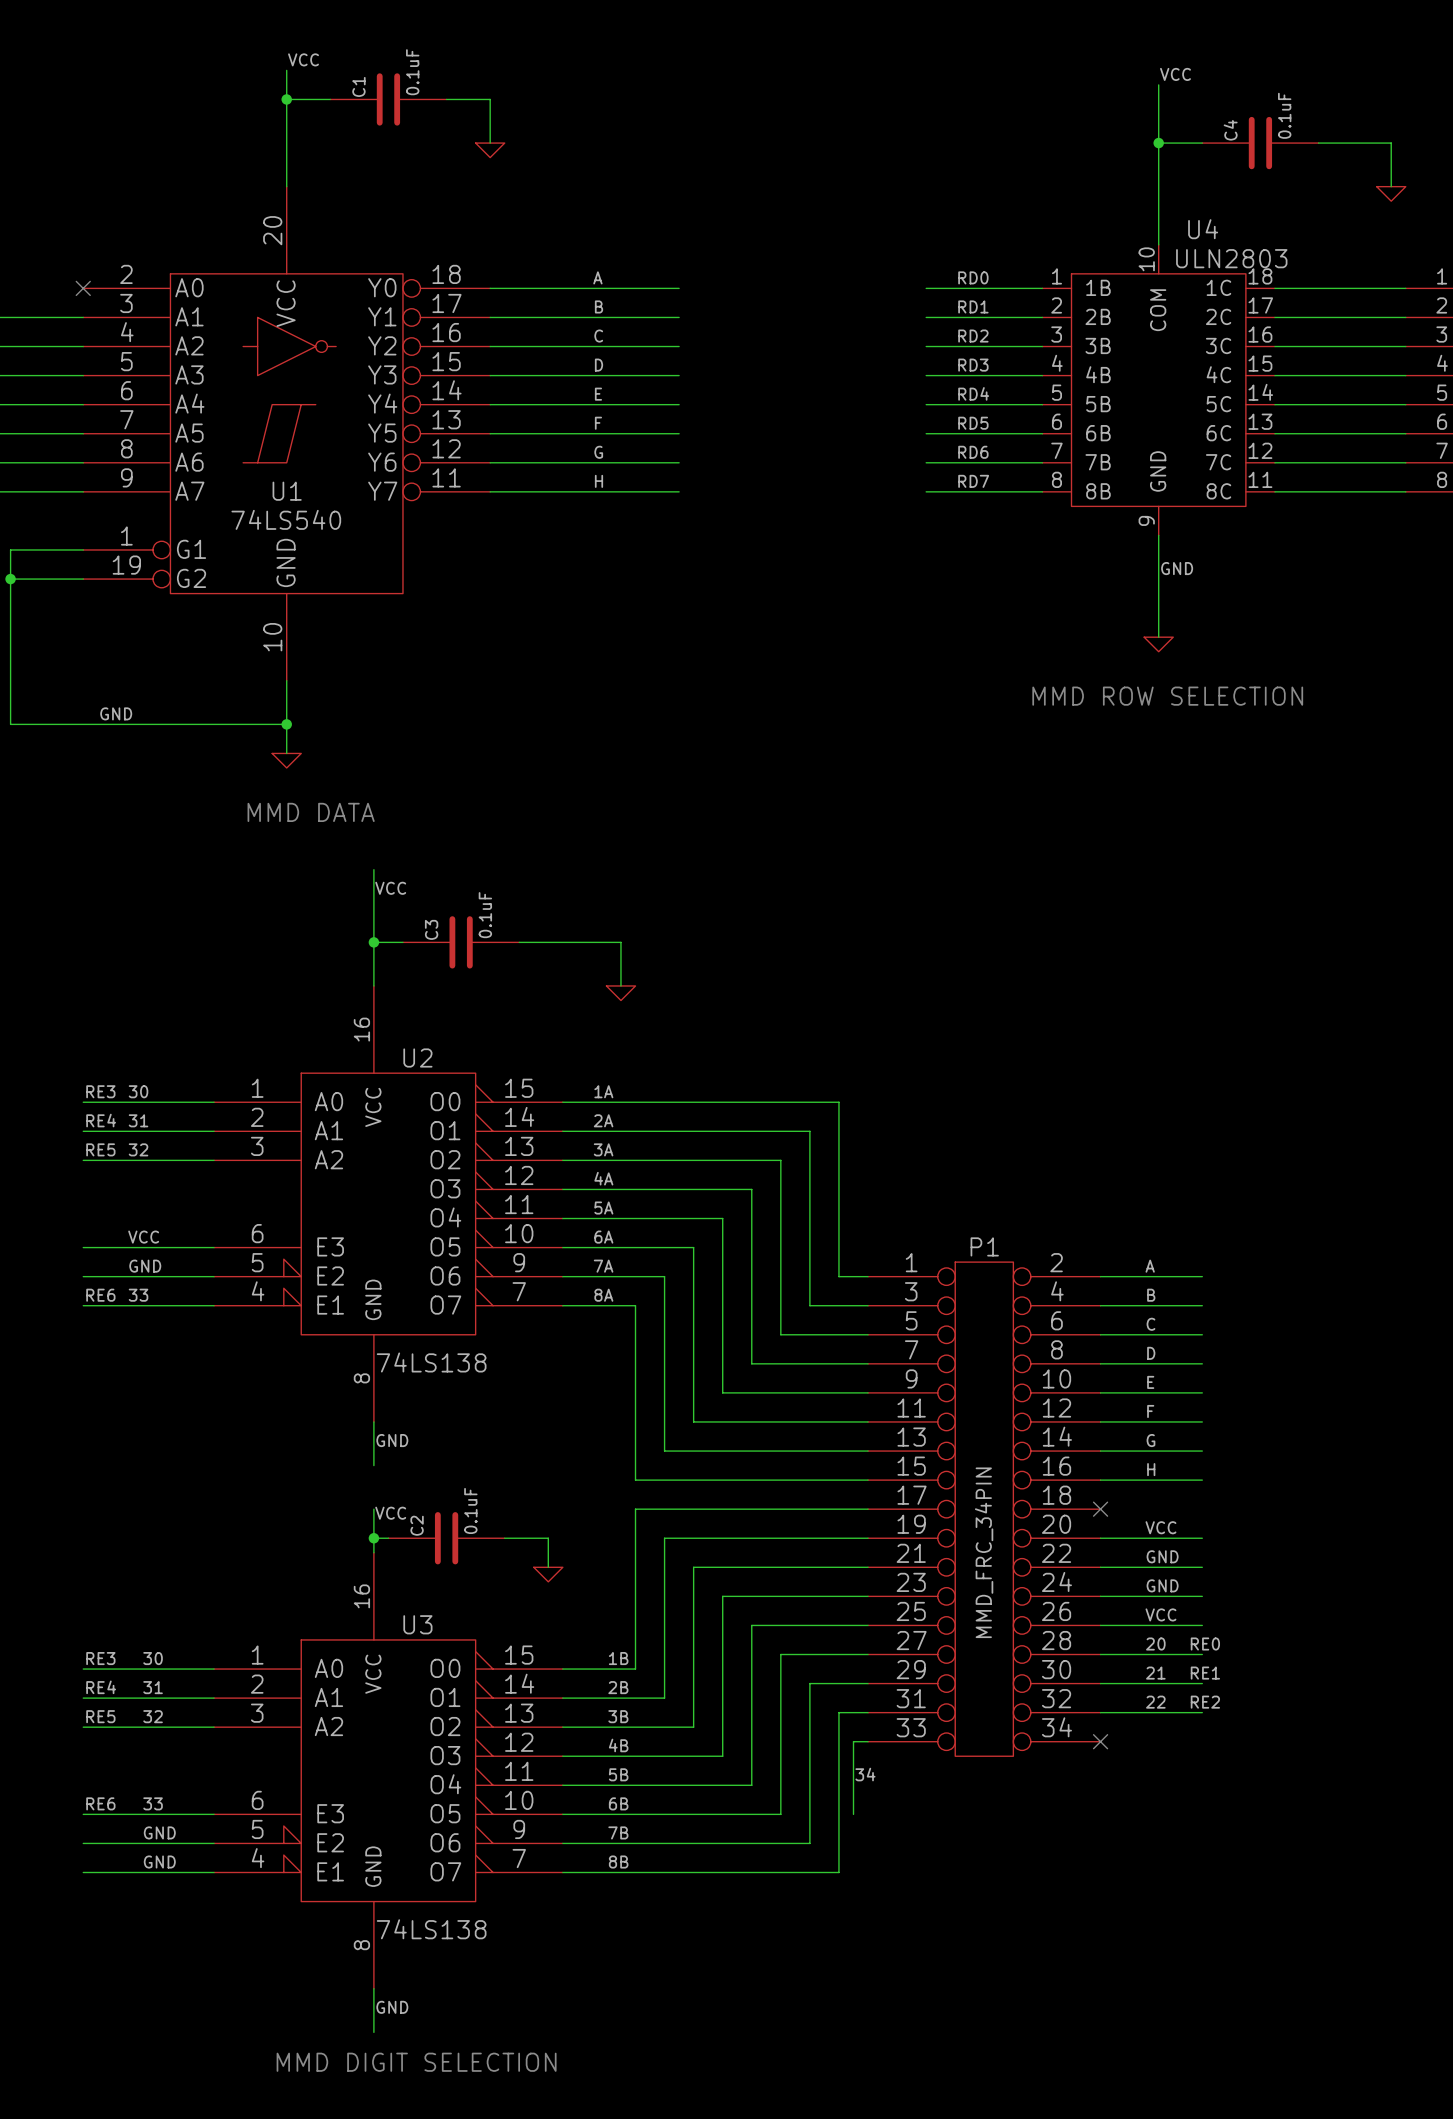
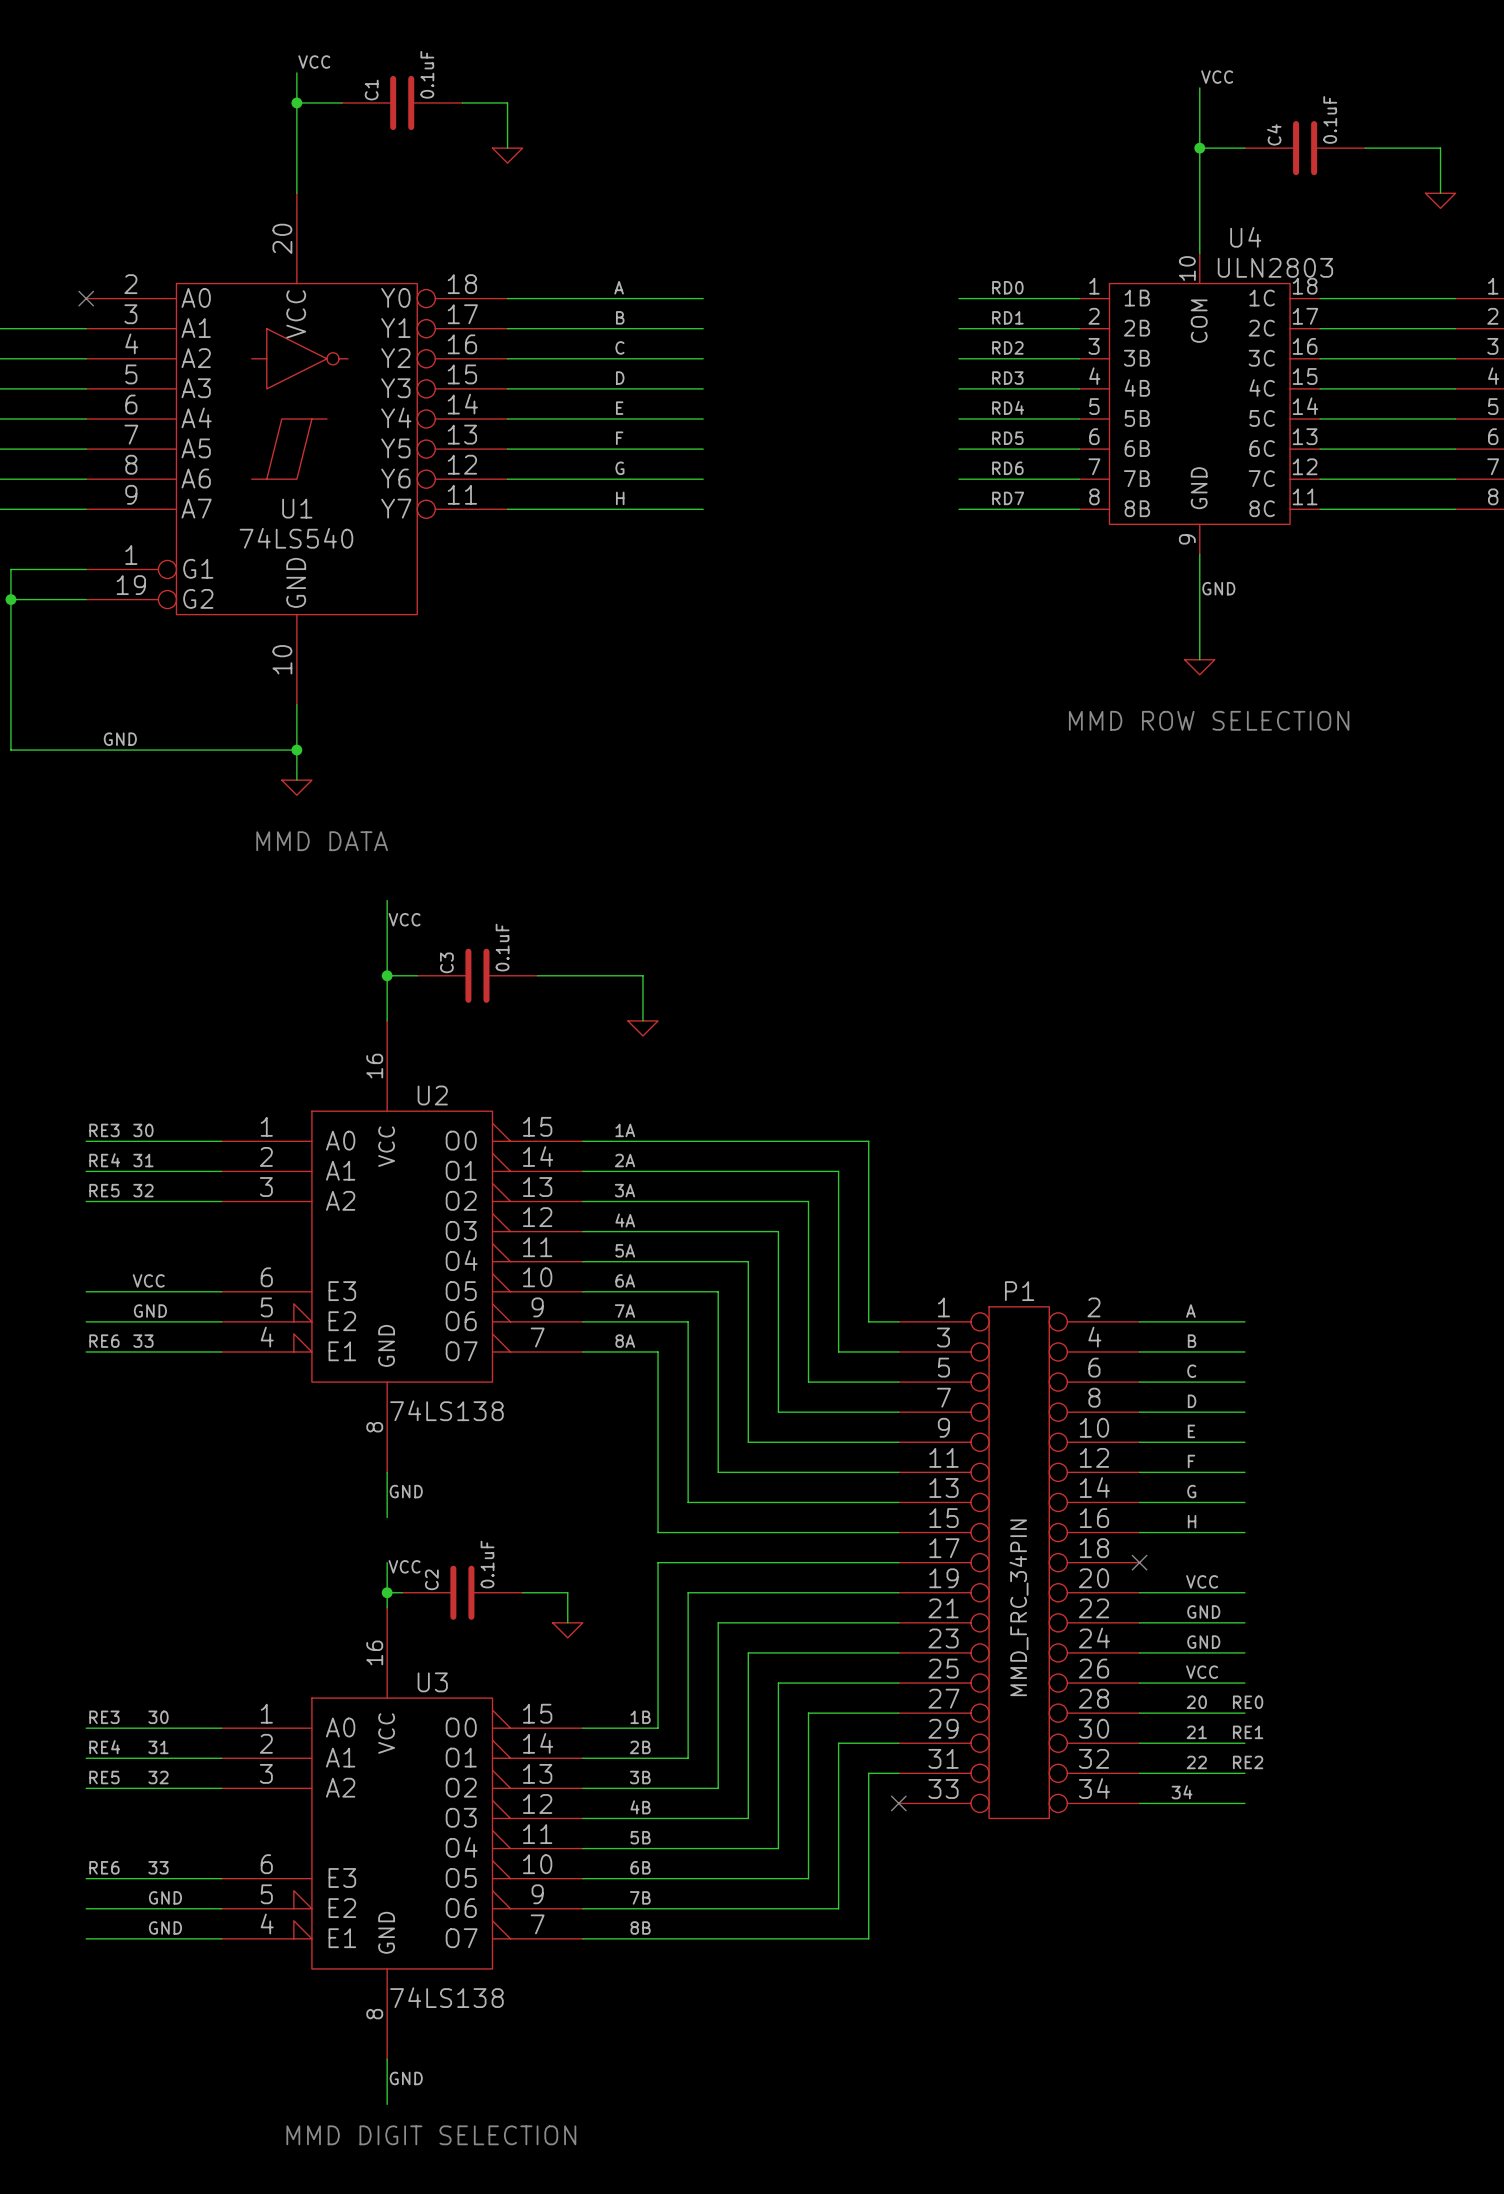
wire: (868, 1741) (853, 1741) (853, 1814) -> none
no-connect mark: none -> (898, 1803)
wire: none -> (1139, 1803) (1244, 1803)
no-connect mark: (1100, 1741) -> none
label position: 34 (865, 1774) -> 34 (1182, 1792)

